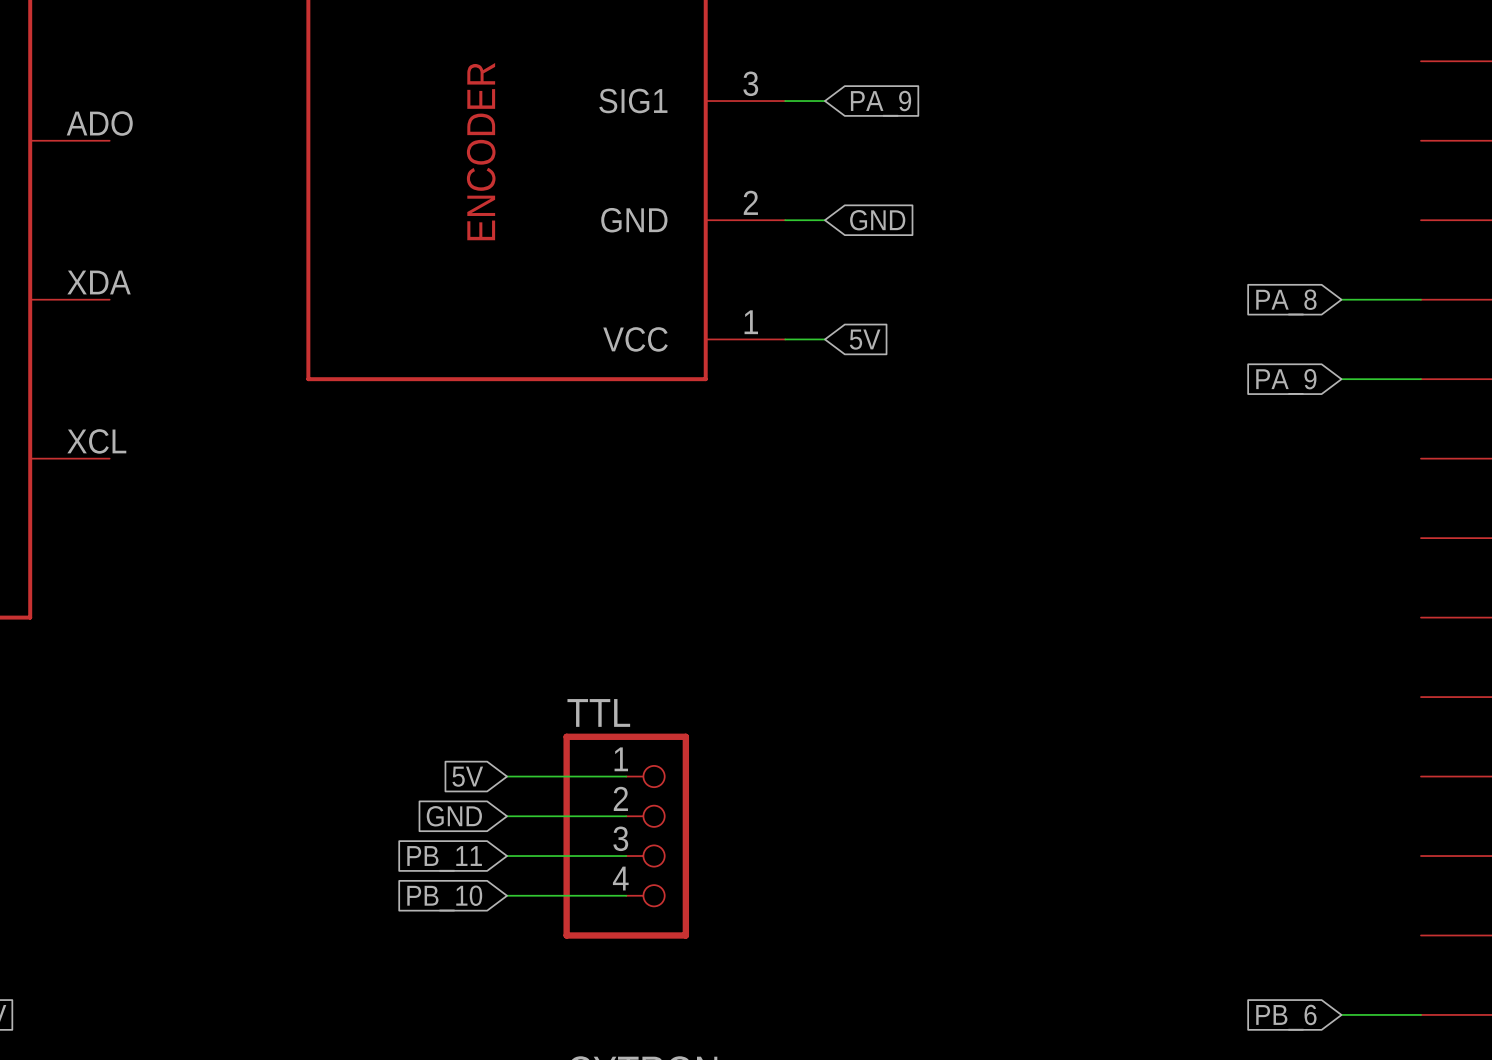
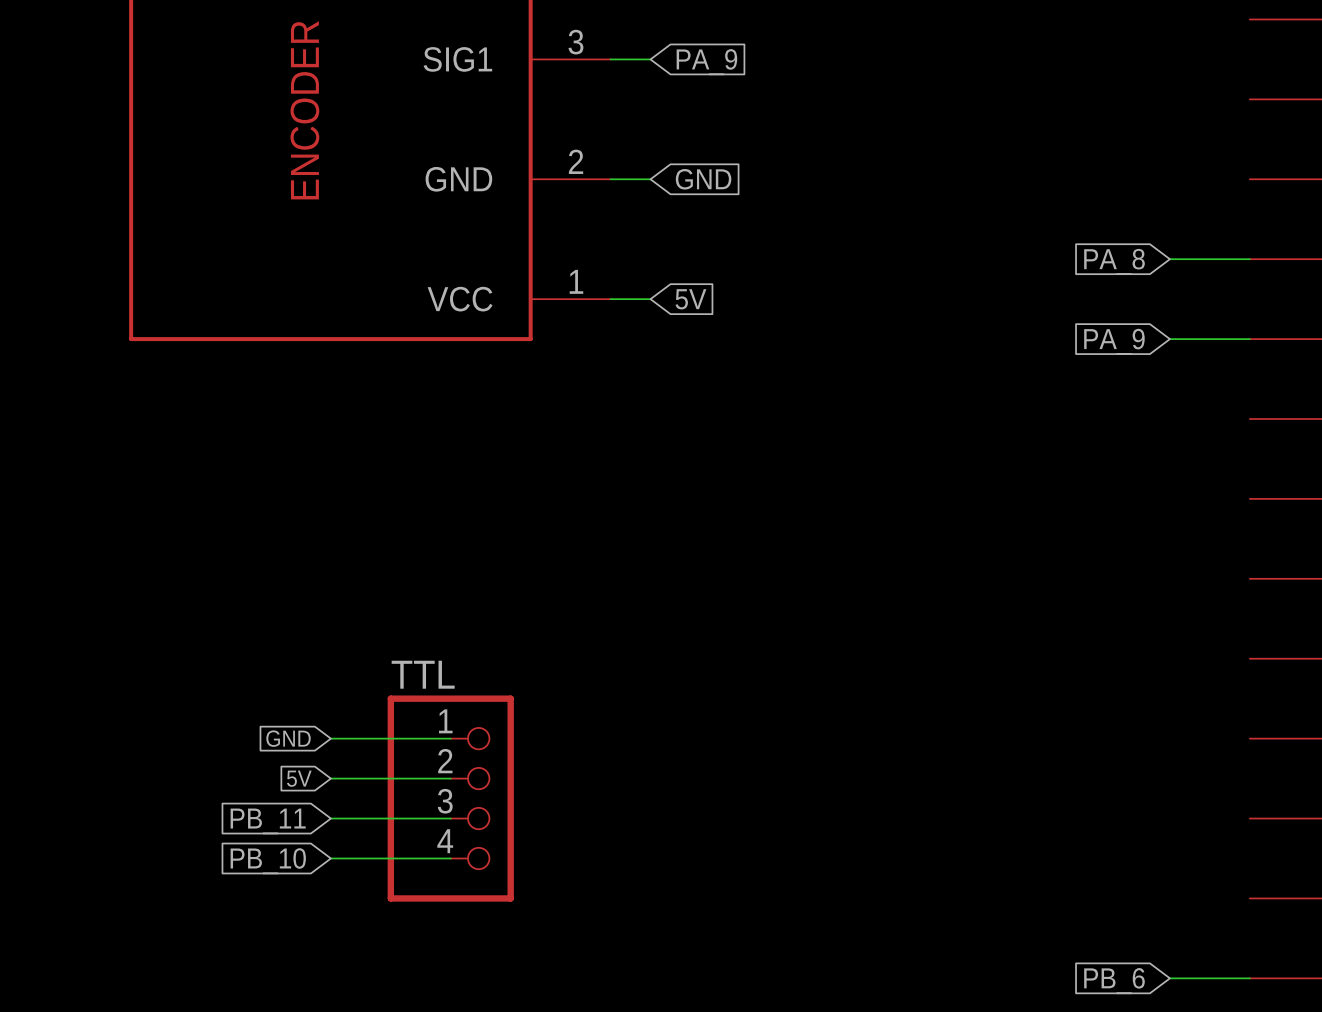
global label: 5V (467, 776) -> GND (288, 738)
global label: GND (454, 816) -> 5V (299, 778)

